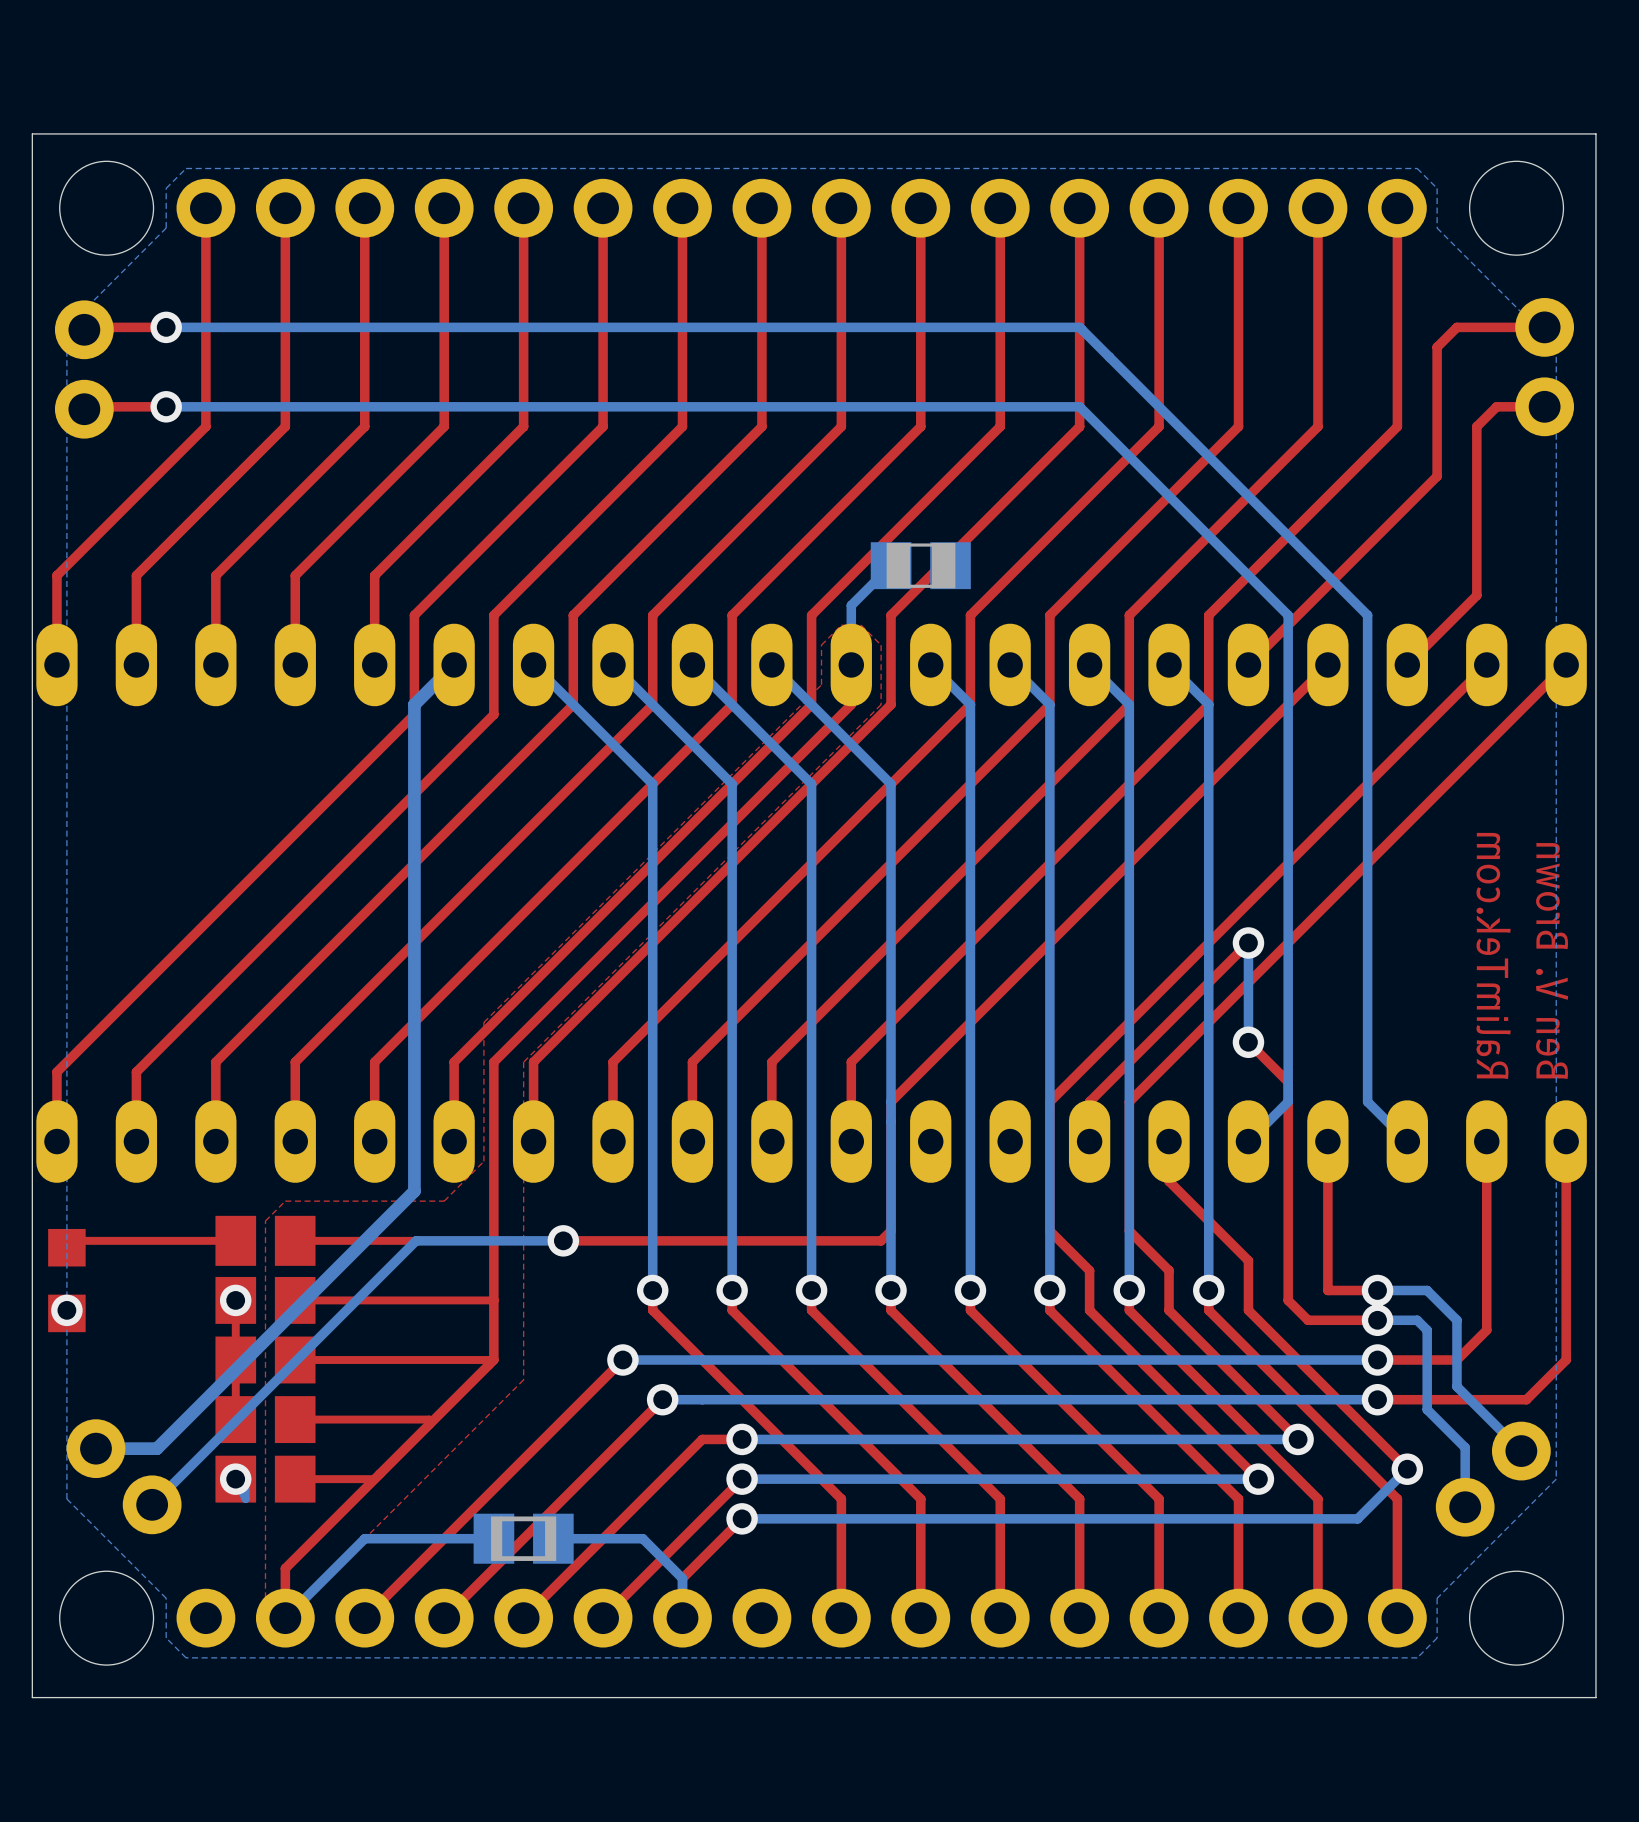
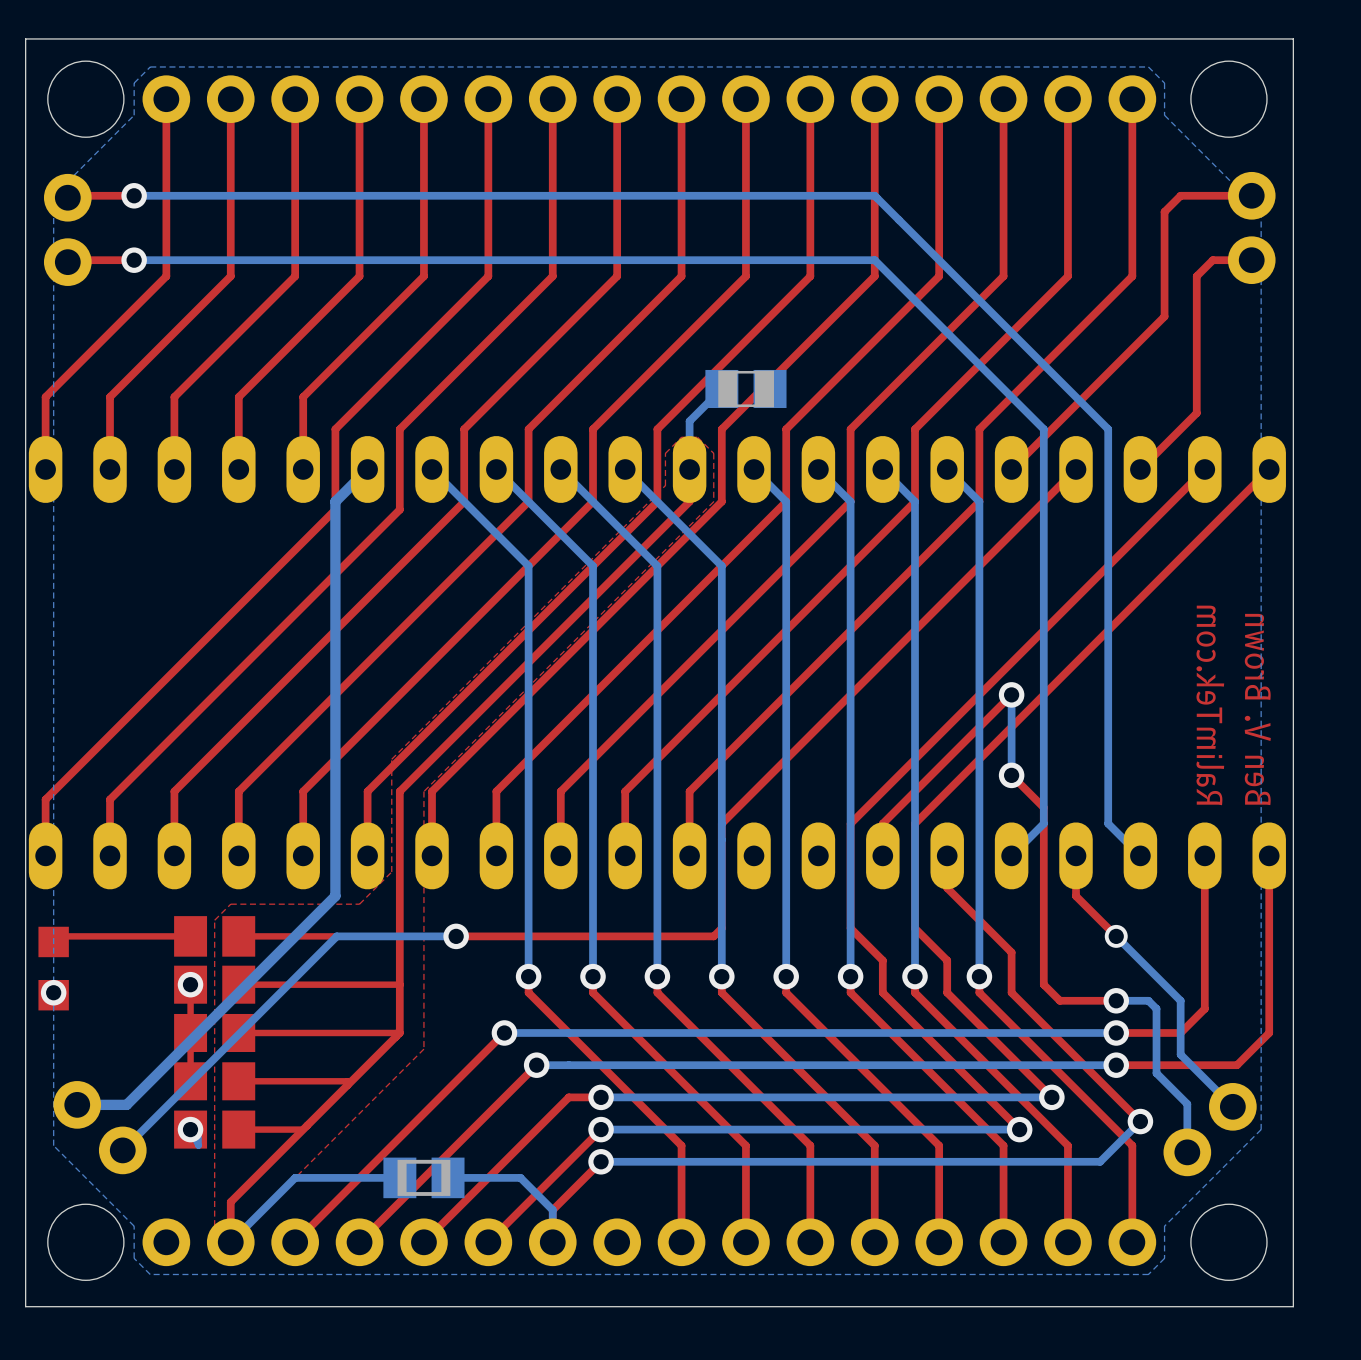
top track: (1327, 1191) (1327, 1290) (1377, 1290) -> (1076, 896) (1116, 936)
via: none -> (1116, 936)
via: (1377, 1290) -> none
bottom track: (1427, 1290) (1377, 1290) -> (1156, 976) (1116, 936)

